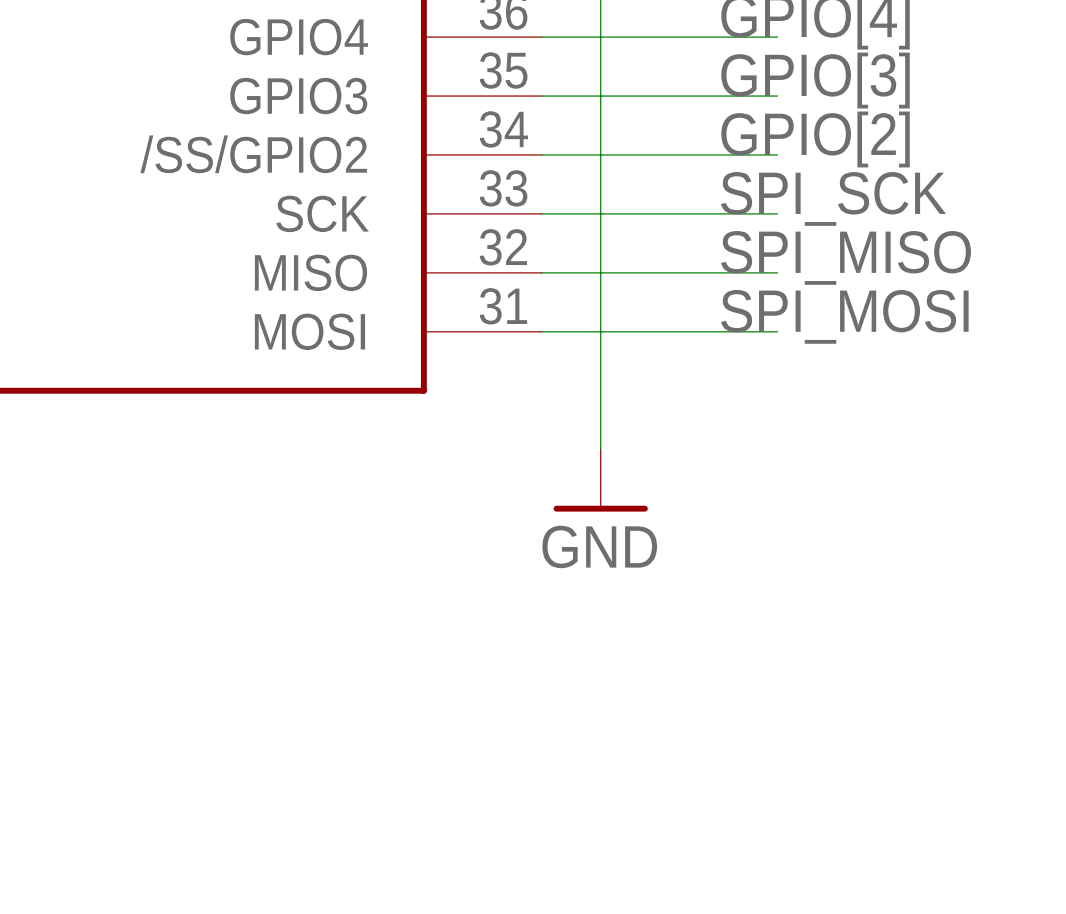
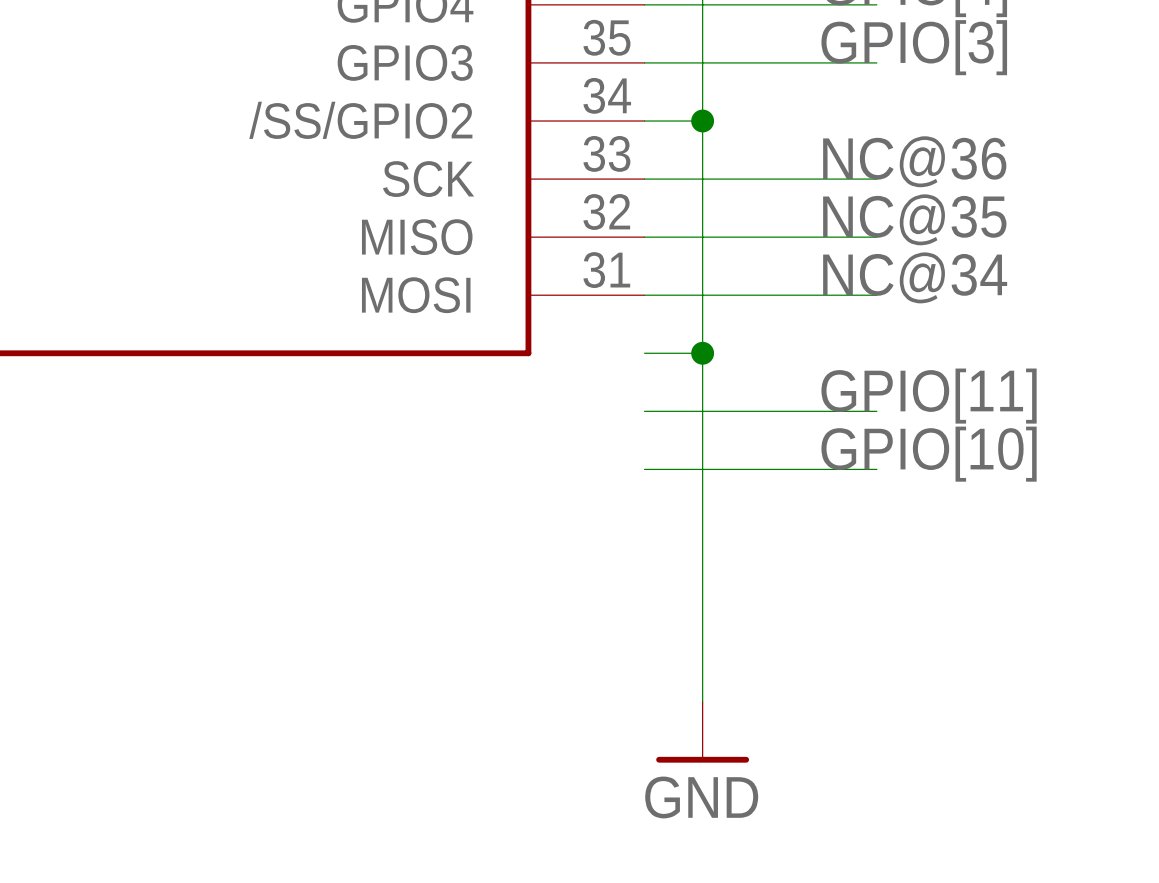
label: GPIO[2] (815, 139) -> none
wire: (600, 154) (777, 154) -> none
junction: none -> (702, 121)
label: SPI_SCK (833, 198) -> NC@36 (914, 161)
label: SPI_MISO (846, 257) -> NC@35 (914, 219)
label: SPI_MOSI (844, 316) -> NC@34 (915, 277)
wire: none -> (644, 353) (702, 353)
junction: none -> (702, 353)
label: none -> GPIO[11] (929, 396)
wire: none -> (644, 411) (876, 411)
wire: none -> (702, 411) (702, 701)
power symbol position: GND (600, 480) -> GND (702, 732)
label: none -> GPIO[10] (929, 454)
wire: none -> (644, 469) (876, 469)

